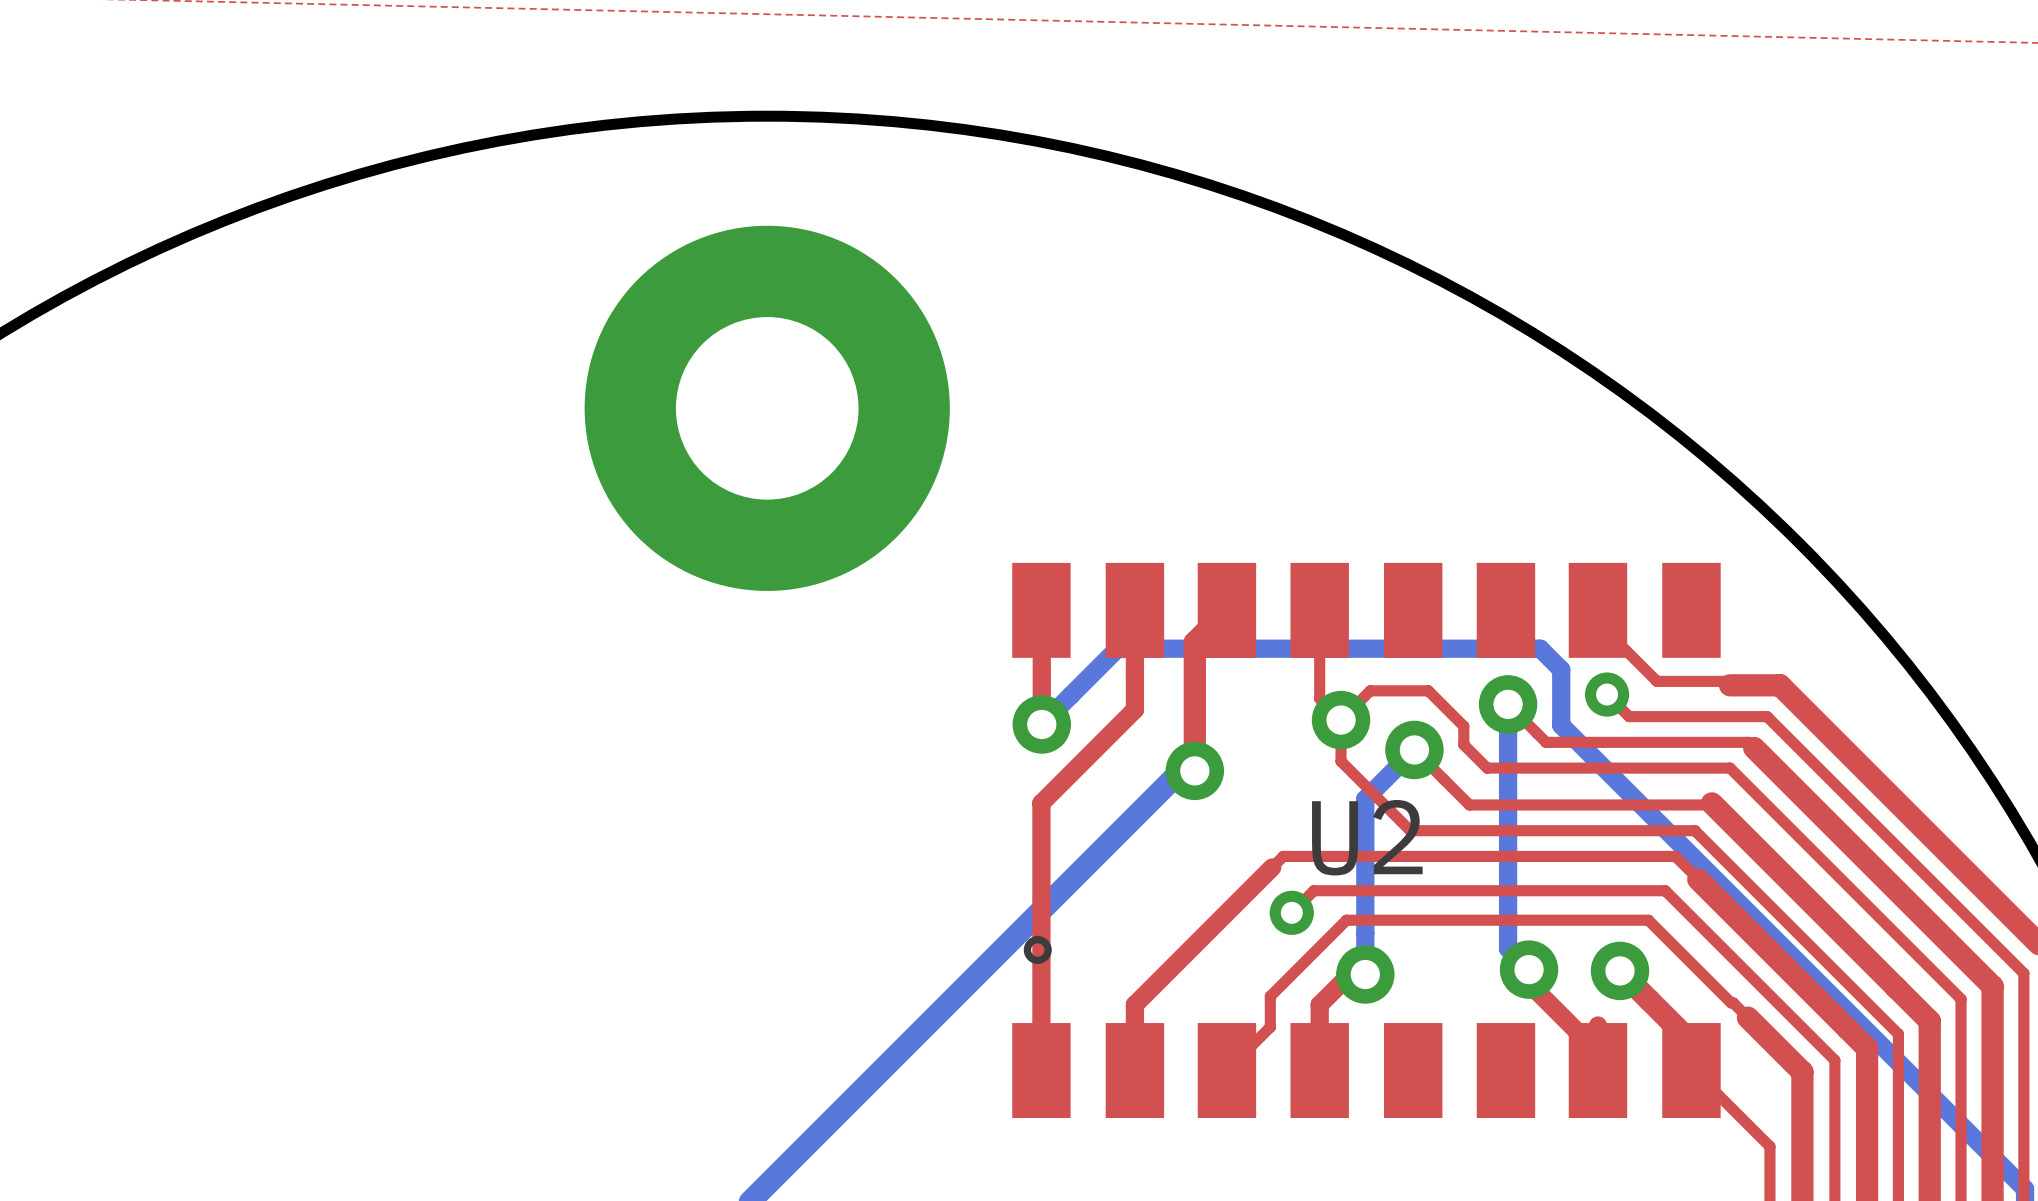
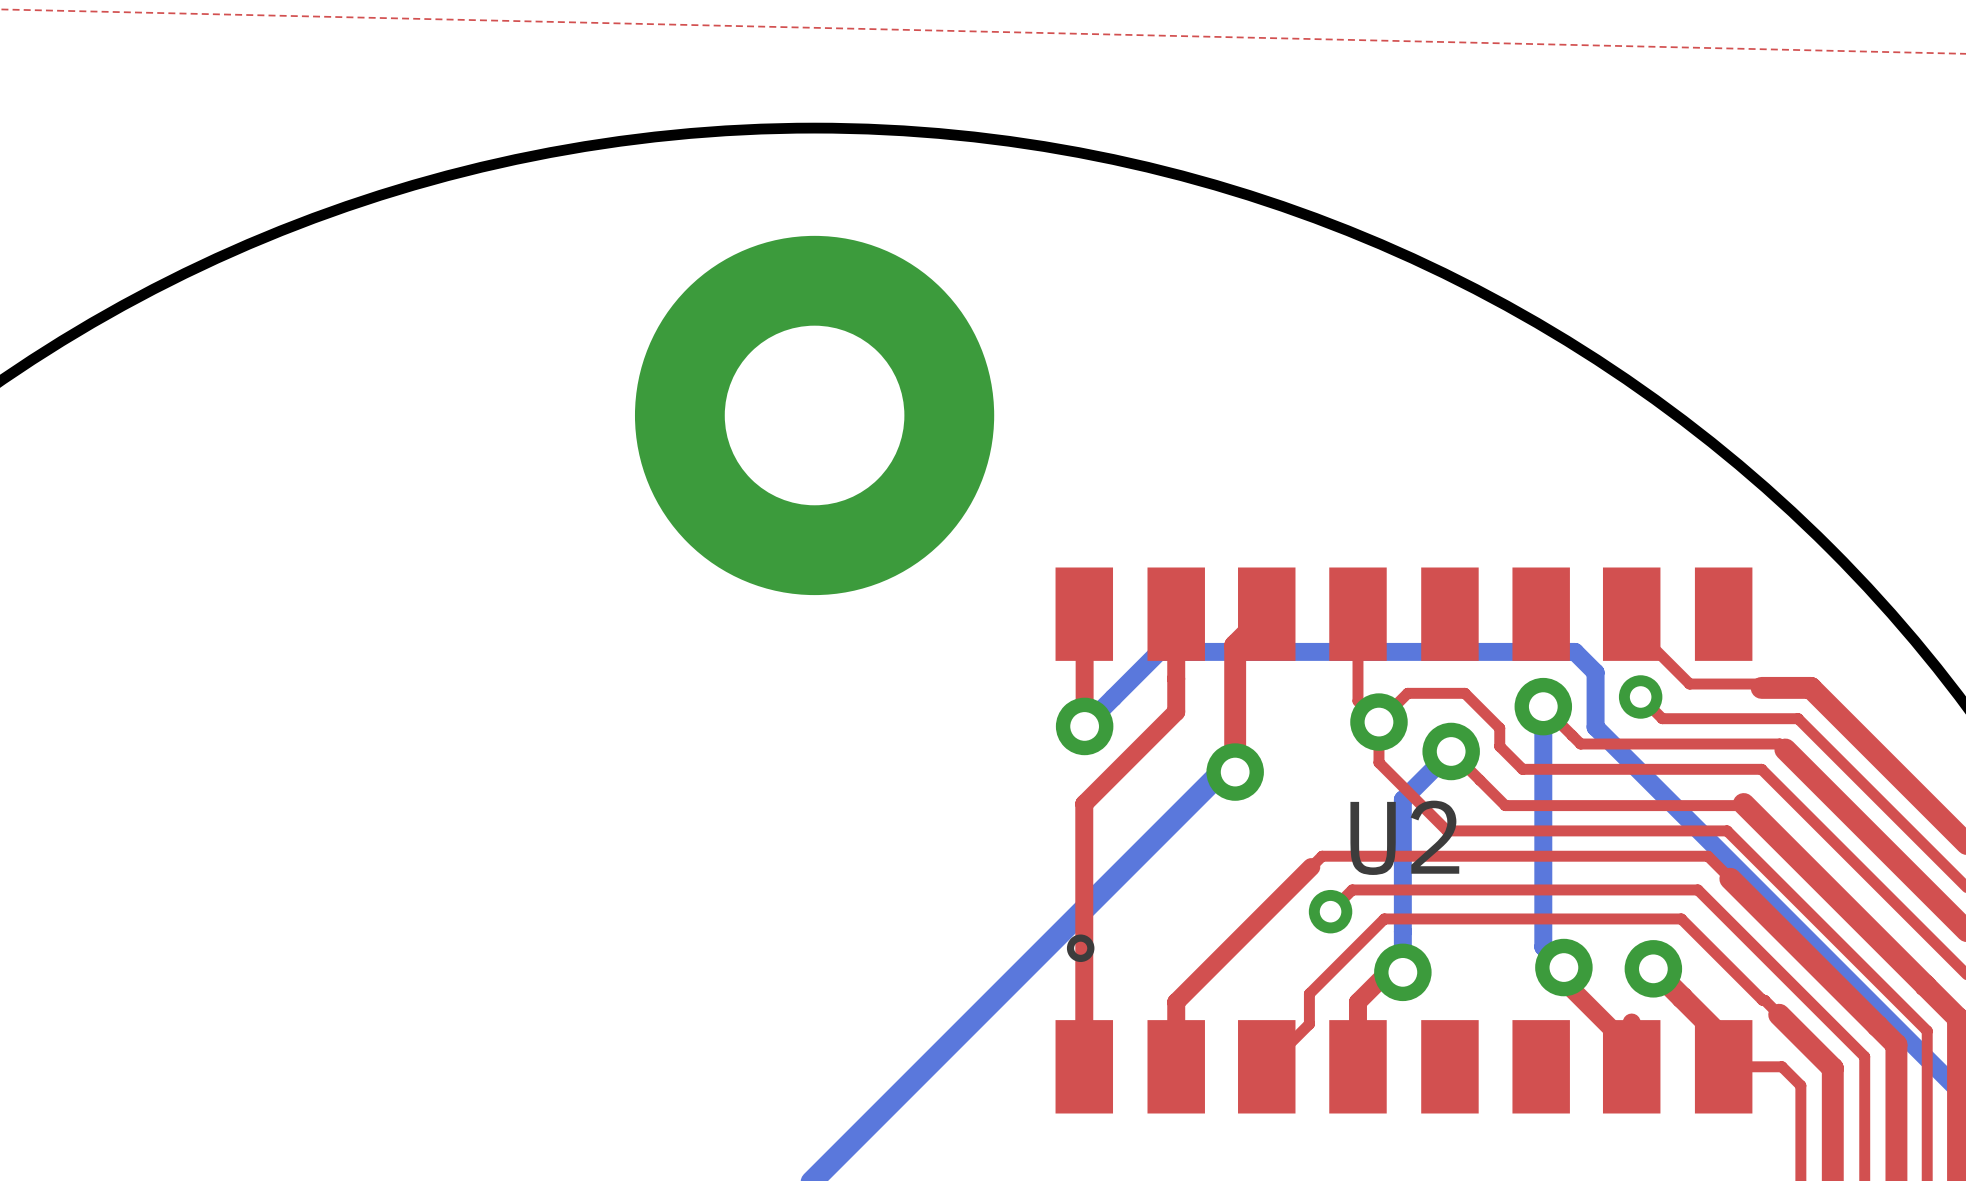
top track: (1693, 1070) (1769, 1146) -> (1726, 1066) (1782, 1066) (1800, 1085) (1800, 1141)

